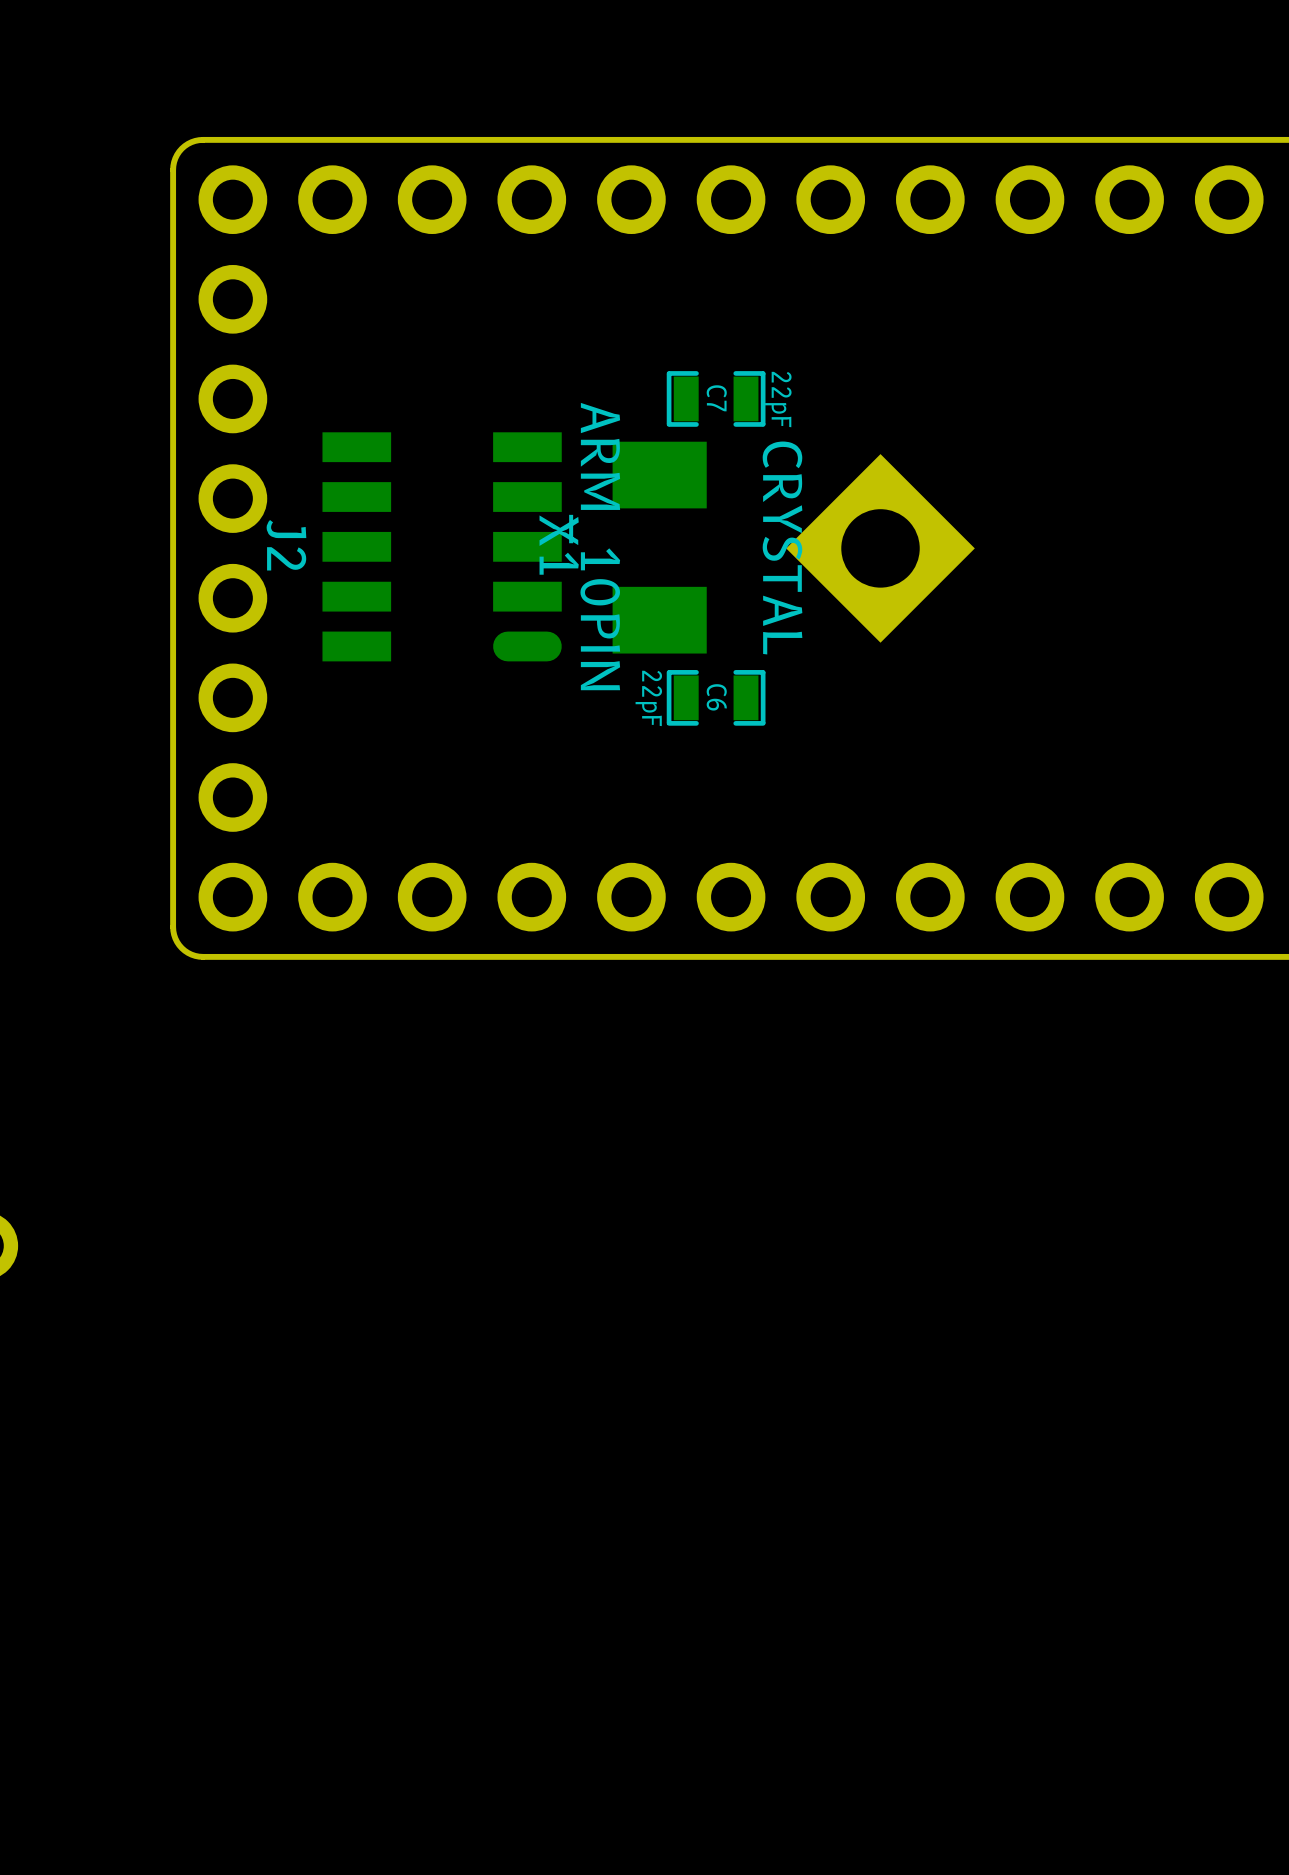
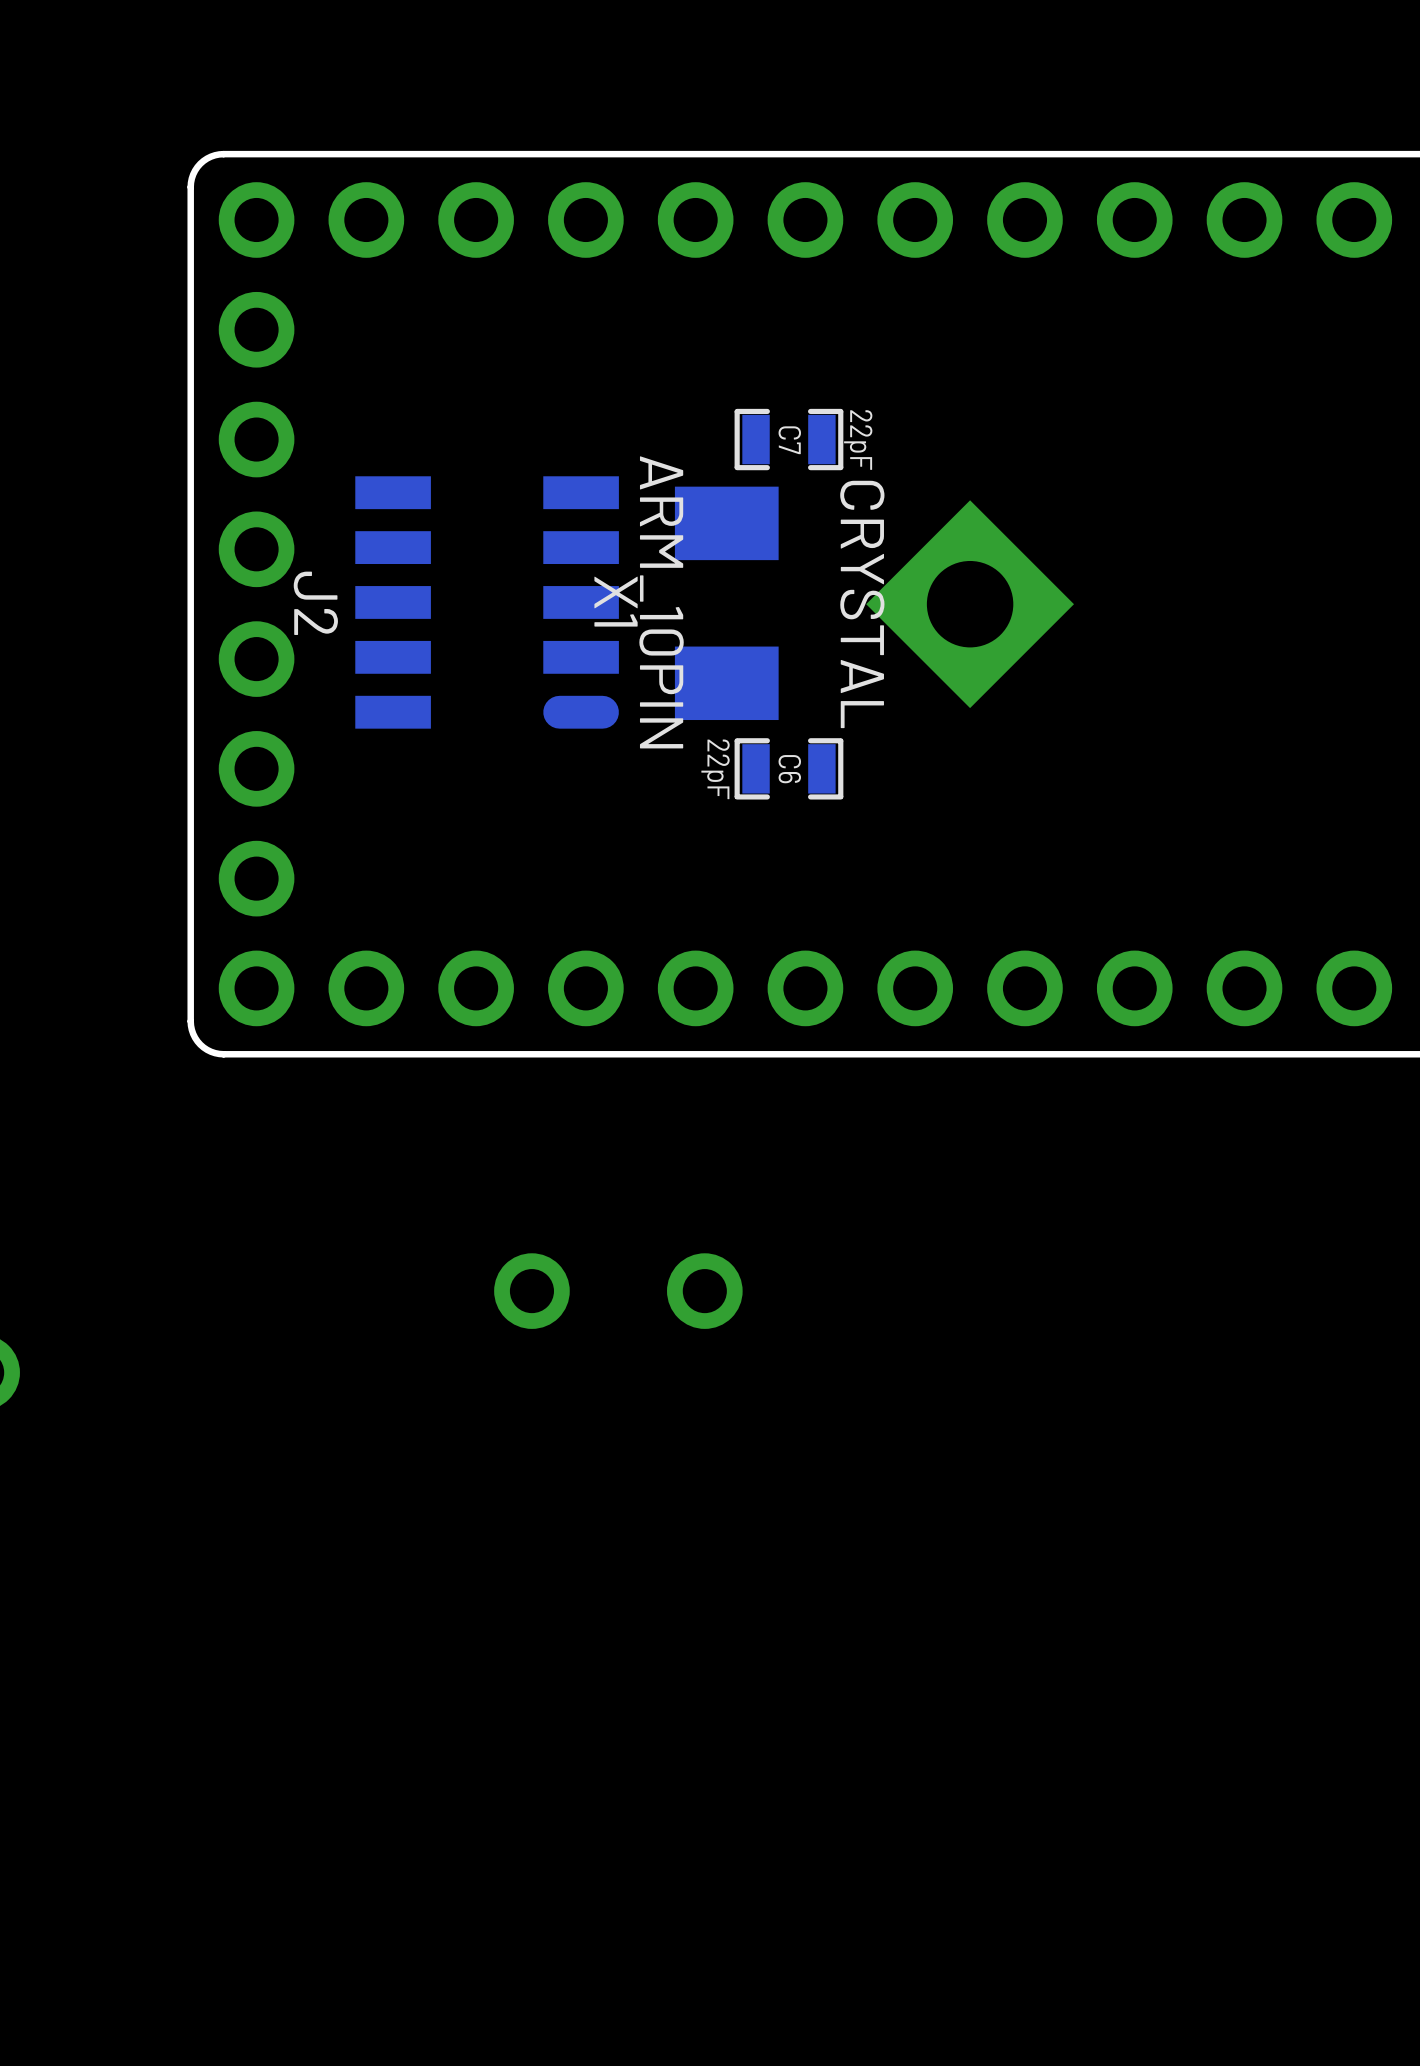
part: none -> (531, 1291)
part: none -> (704, 1291)

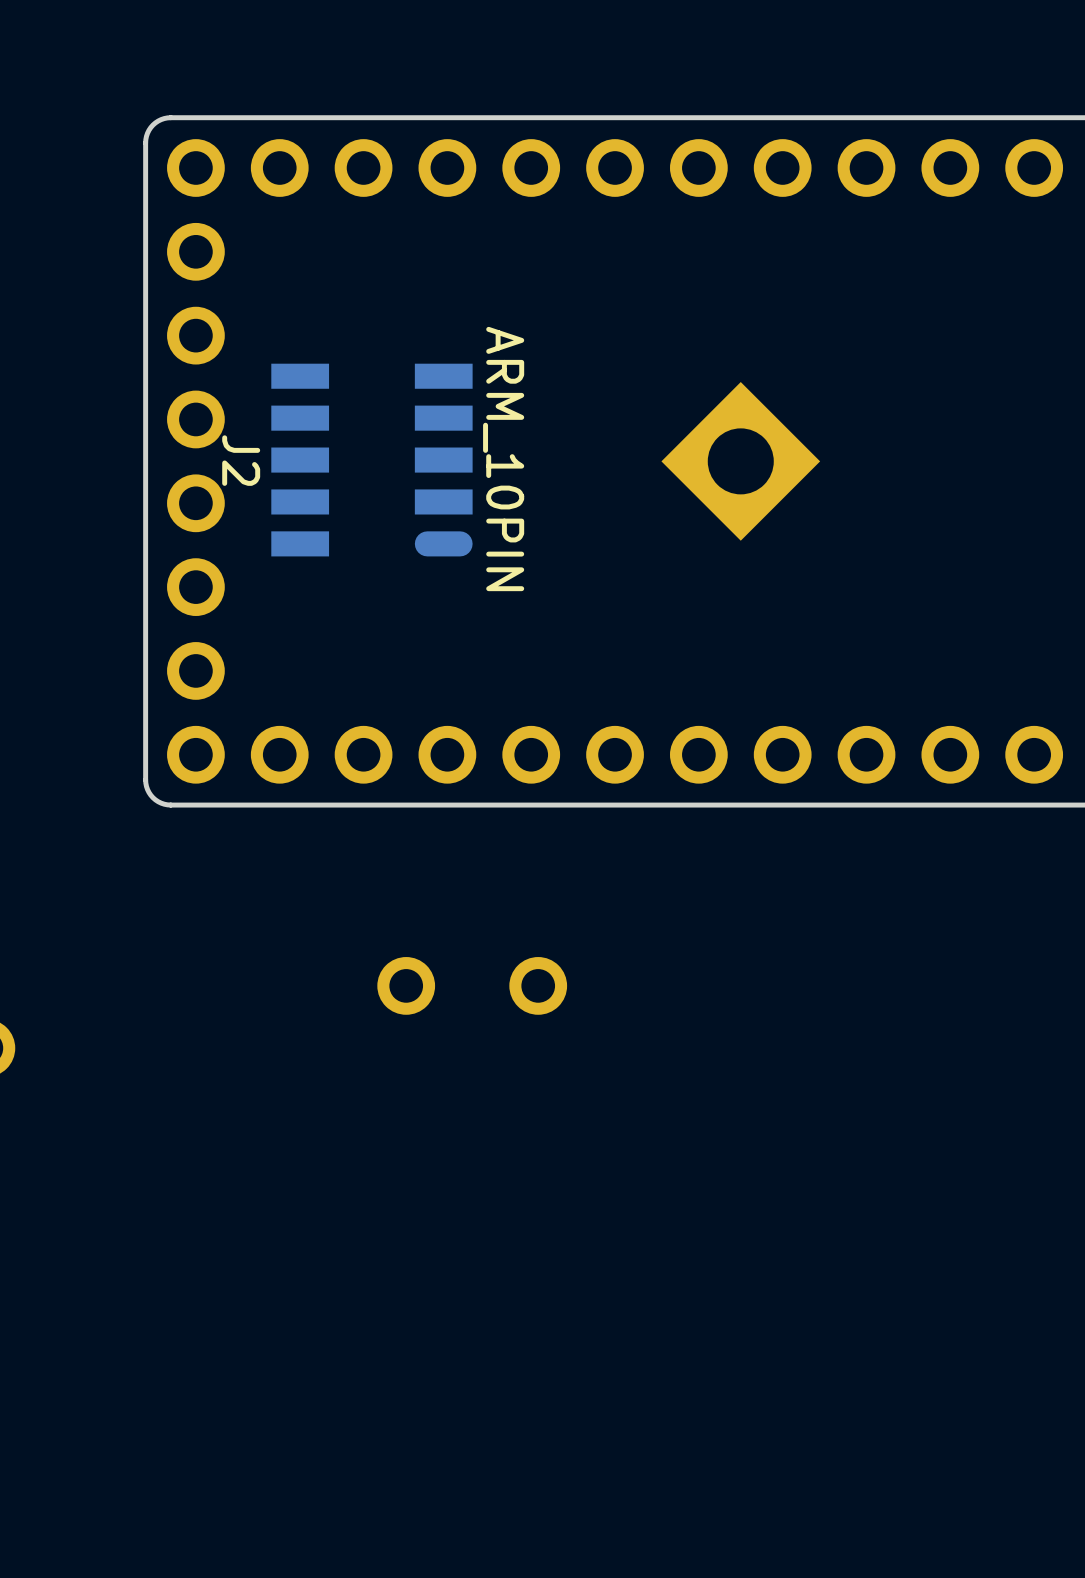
C7: 22pF (788, 439) -> none
X1: CRYSTAL (726, 603) -> none
C6: 22pF (788, 768) -> none

